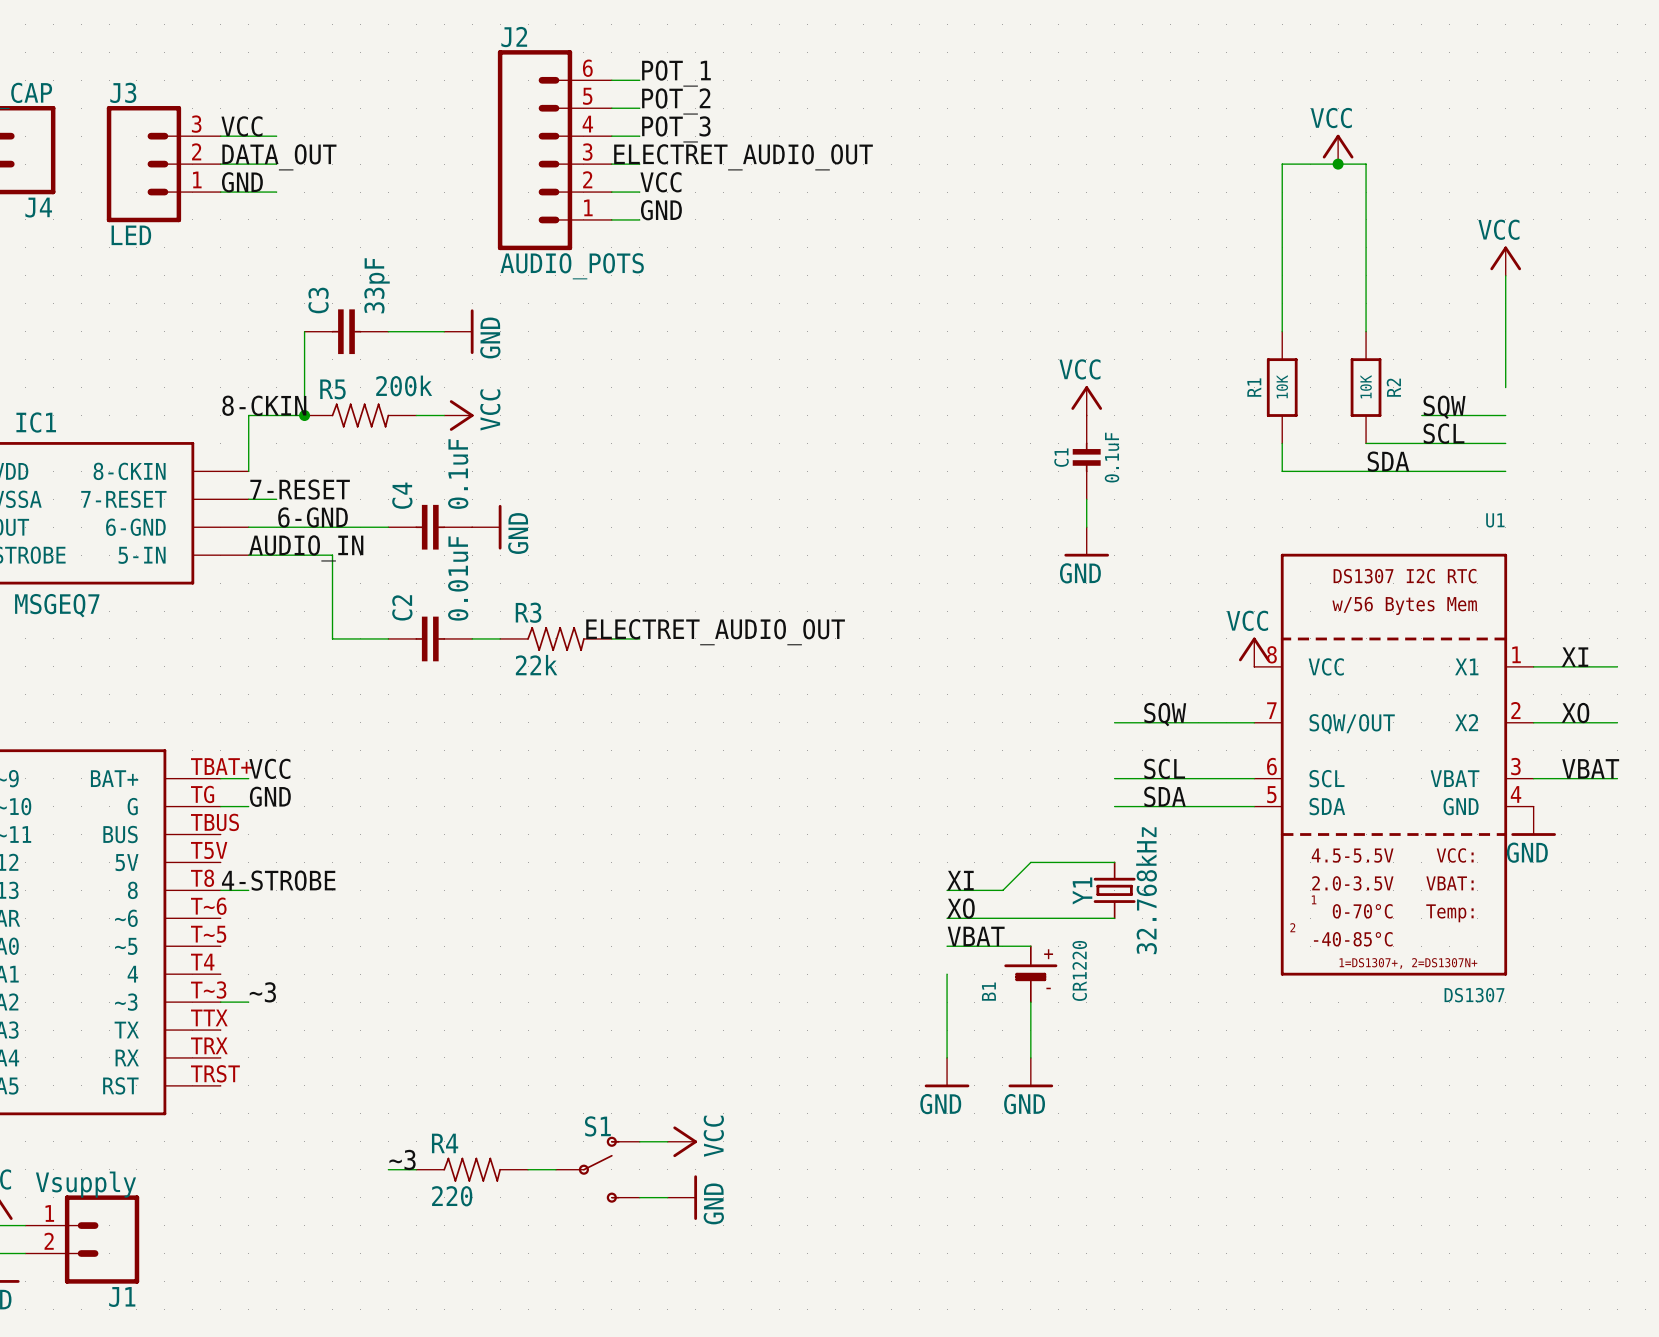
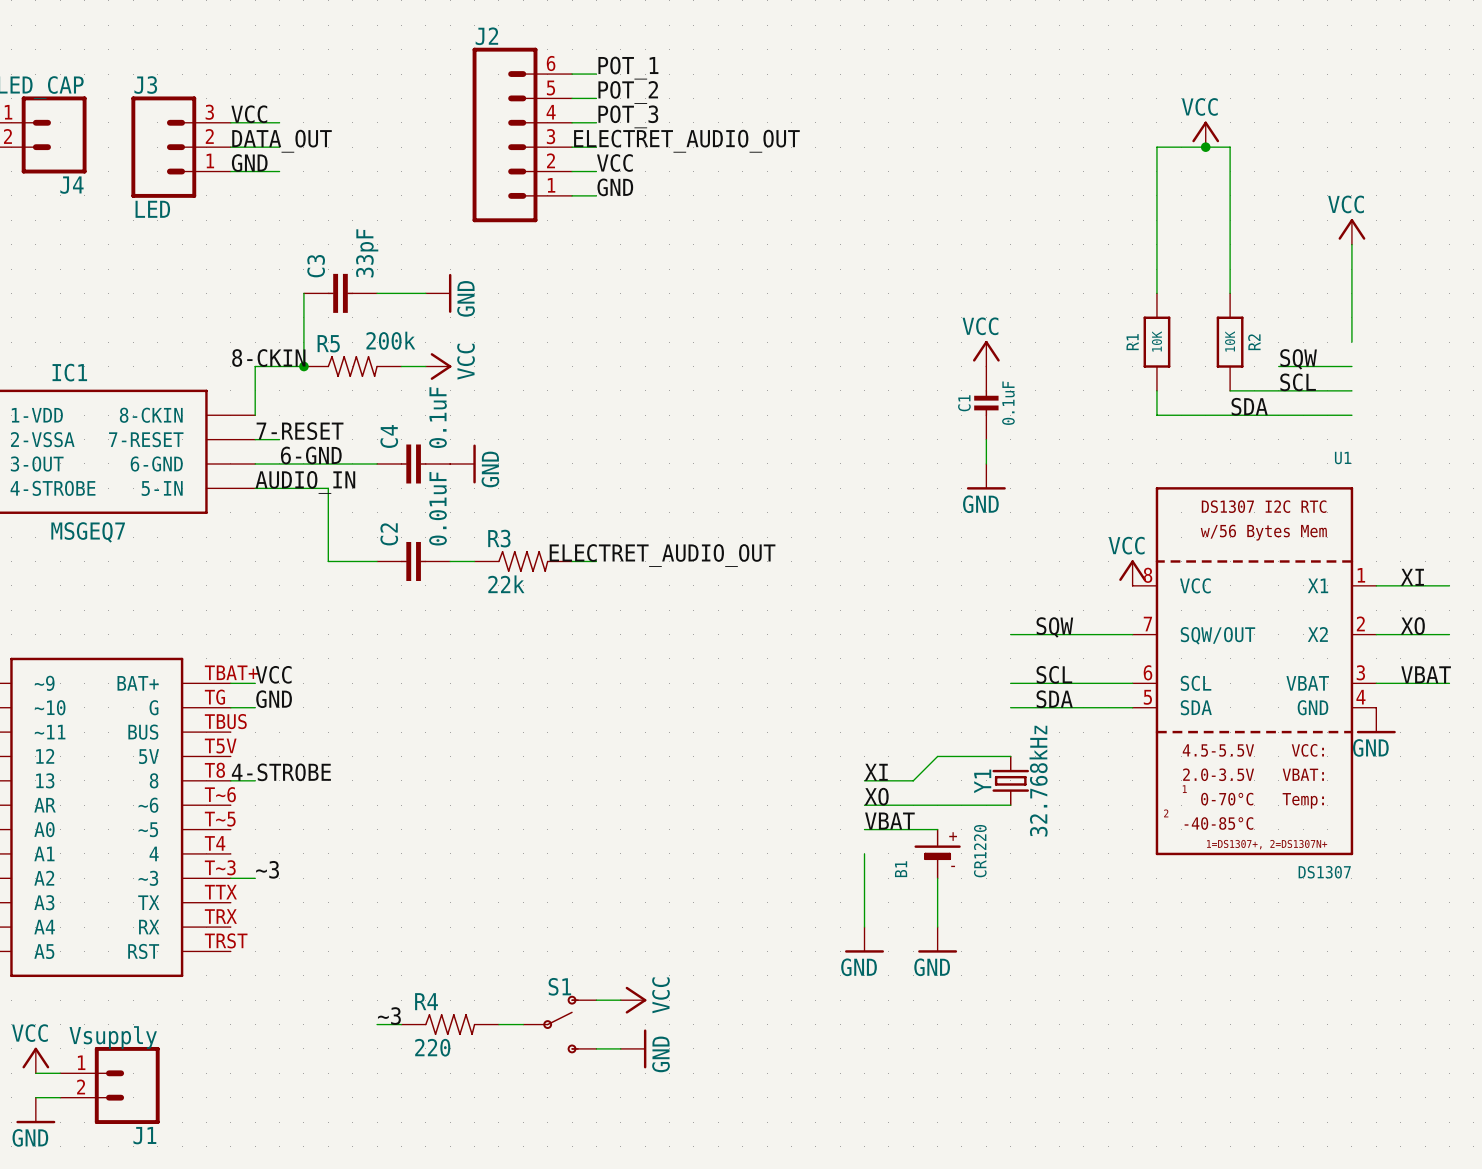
J2 value: AUDIO_POTS (572, 266) -> none

